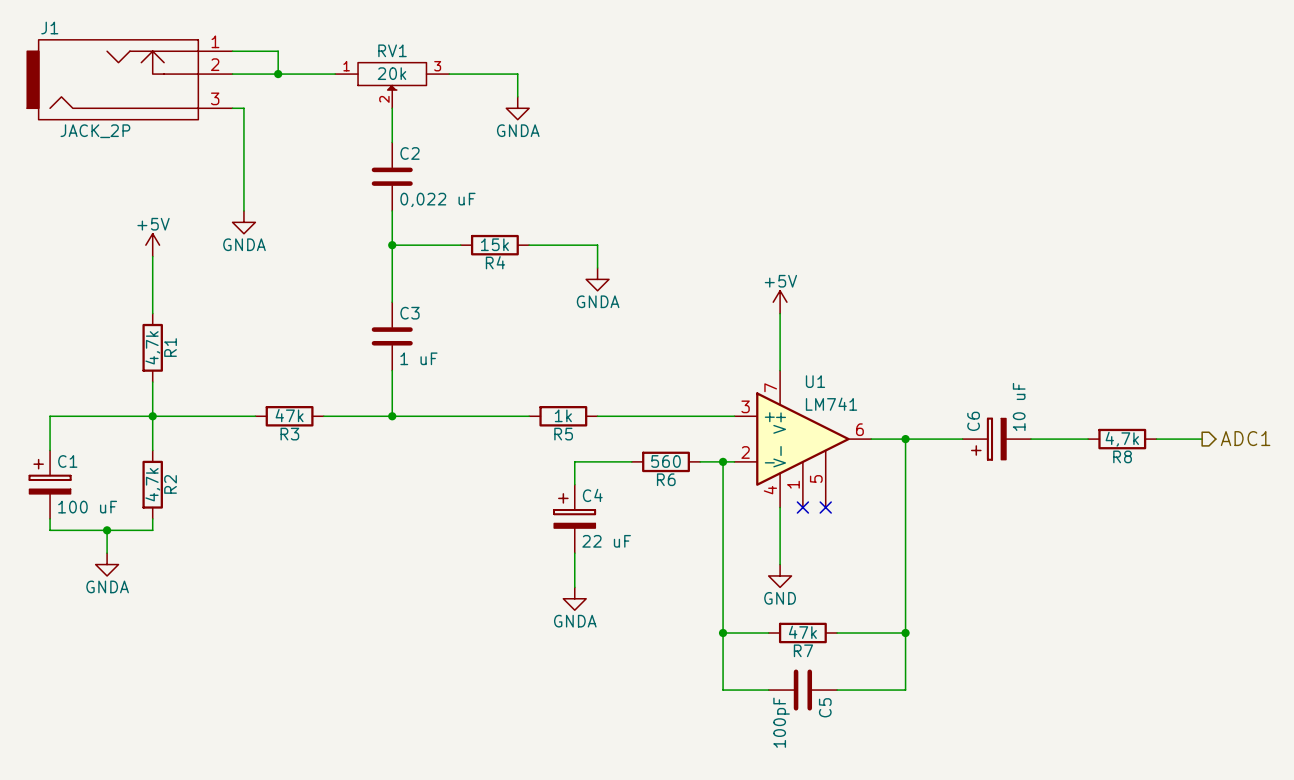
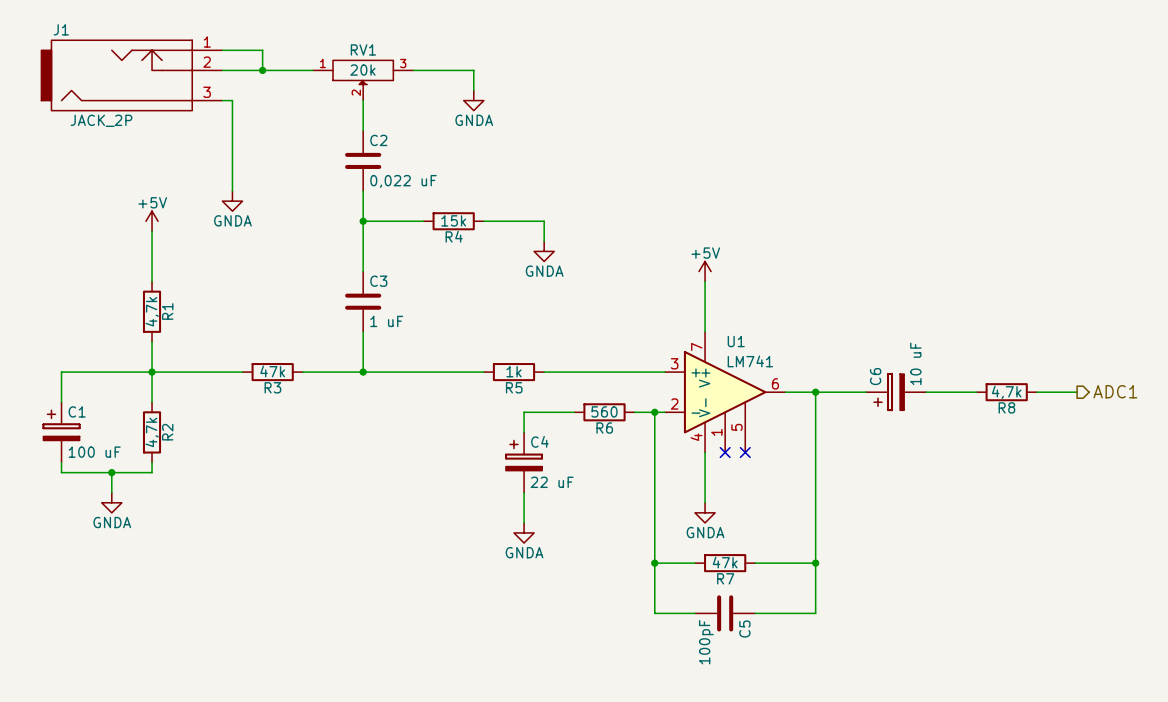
power symbol: GND (780, 575) -> GNDA (705, 512)

